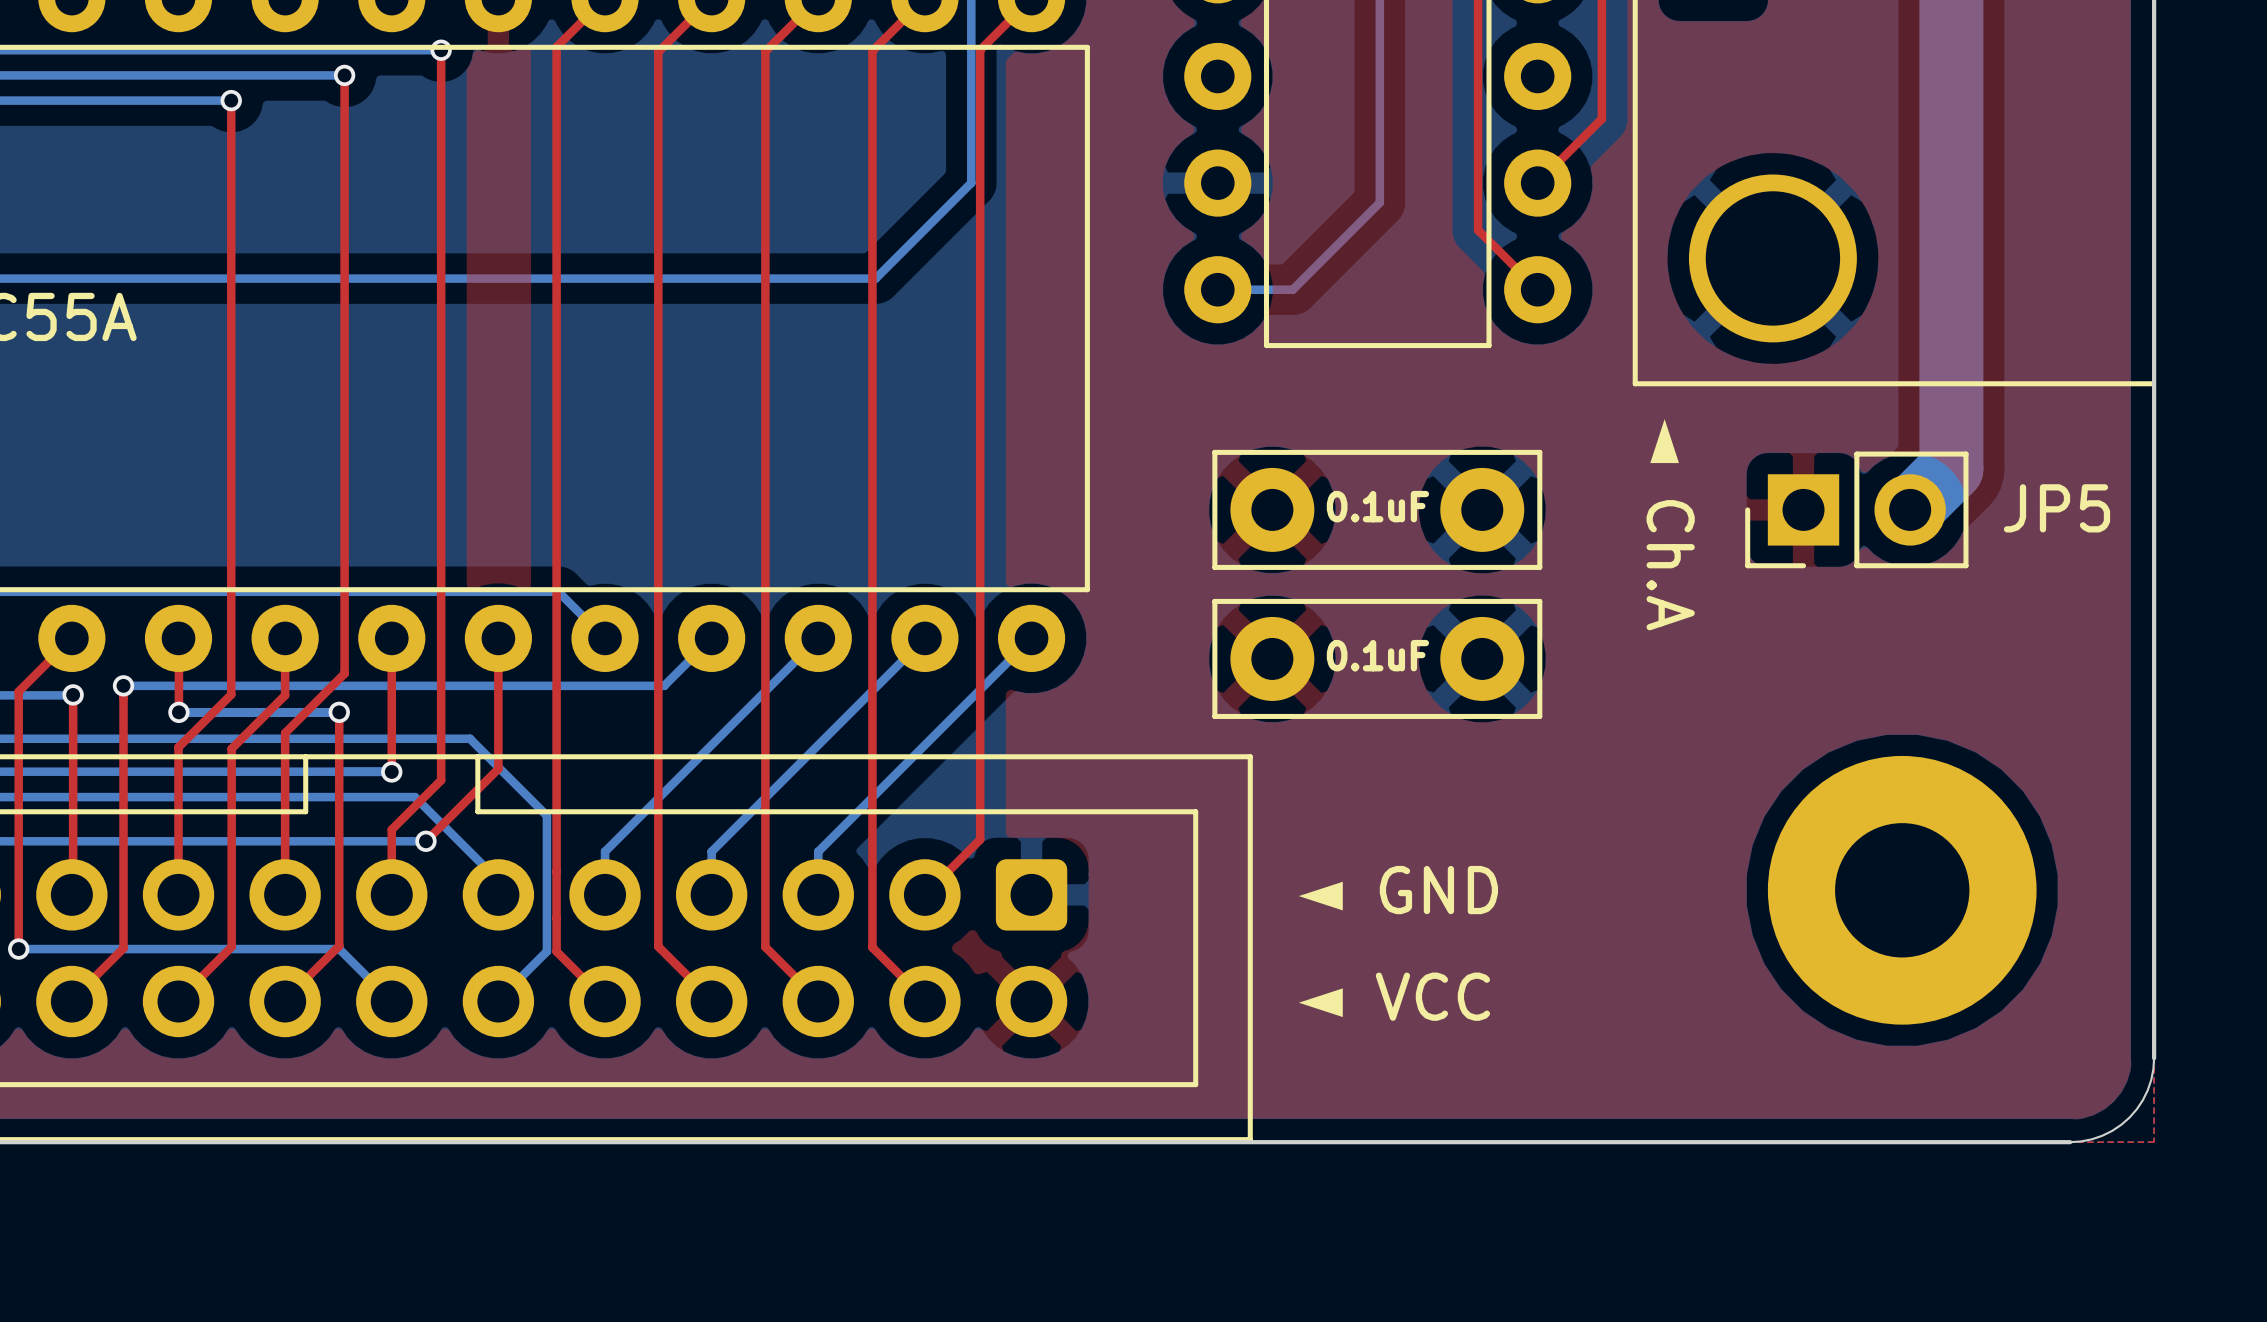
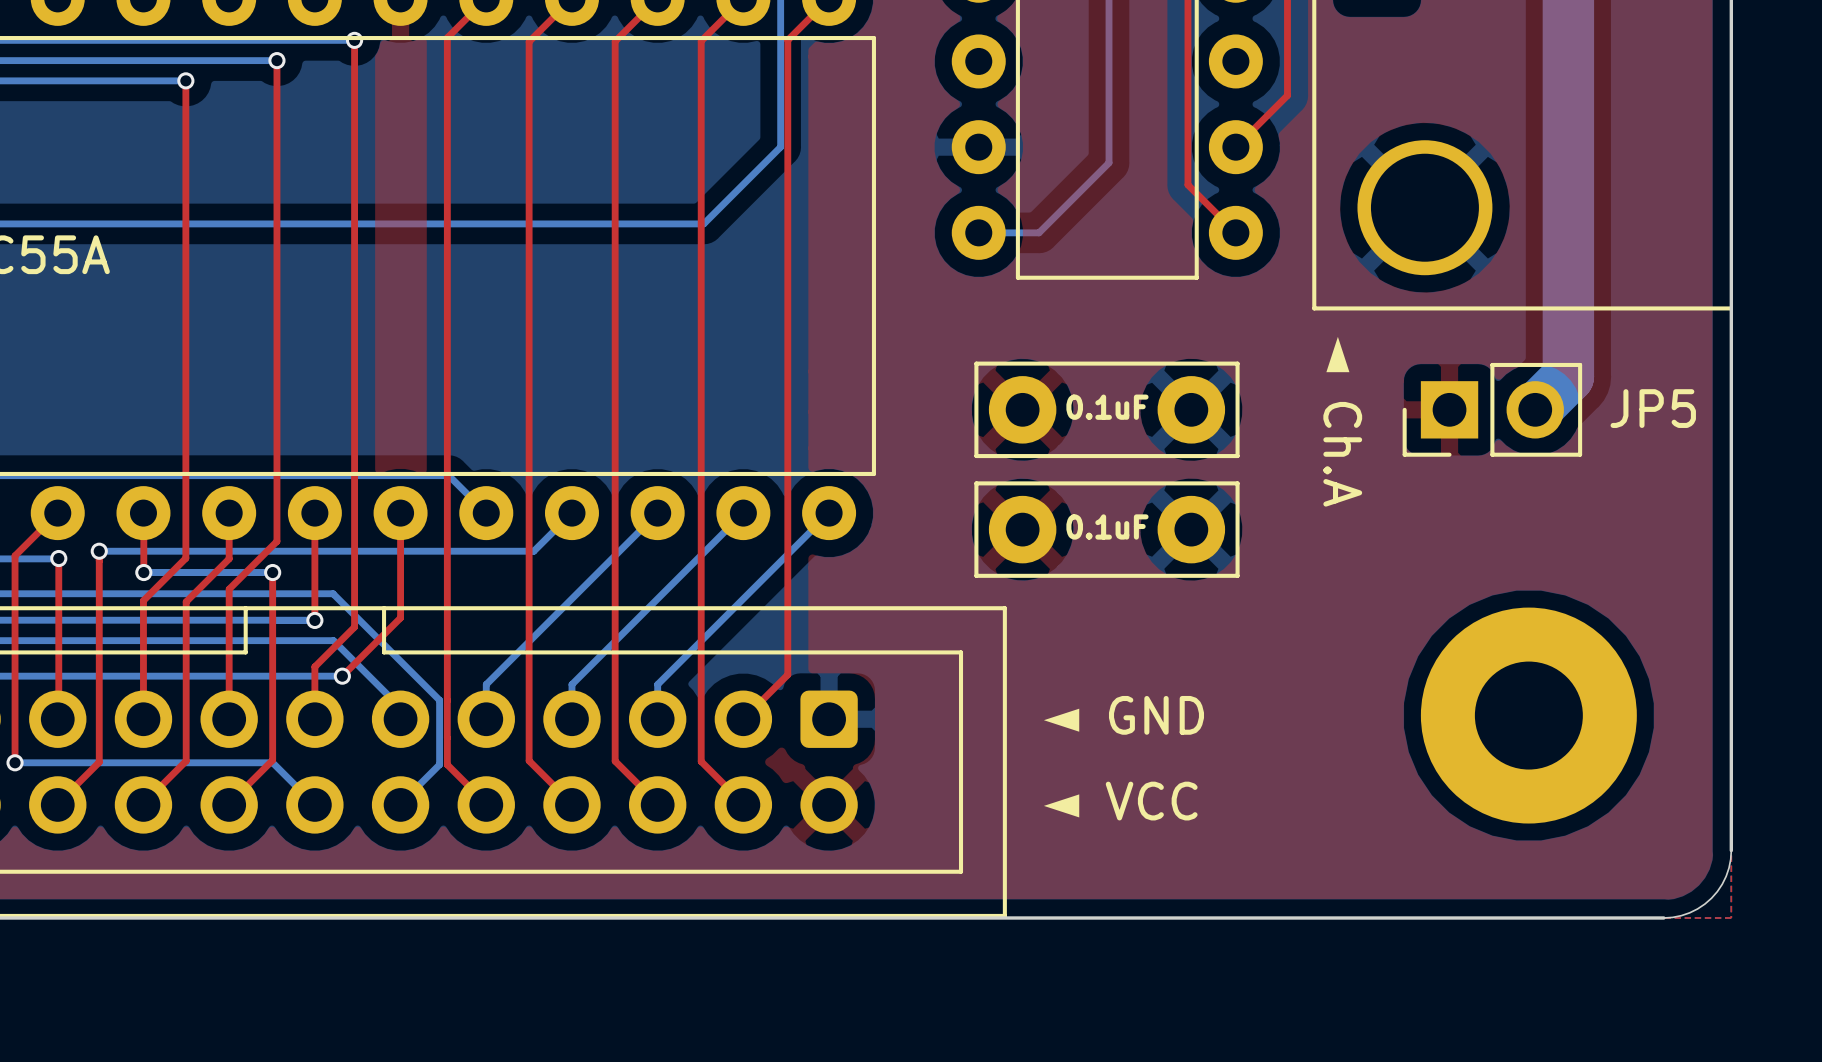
bottom track: (414, 738) (469, 738) (546, 815) (546, 871) -> (333, 593) (439, 700)

